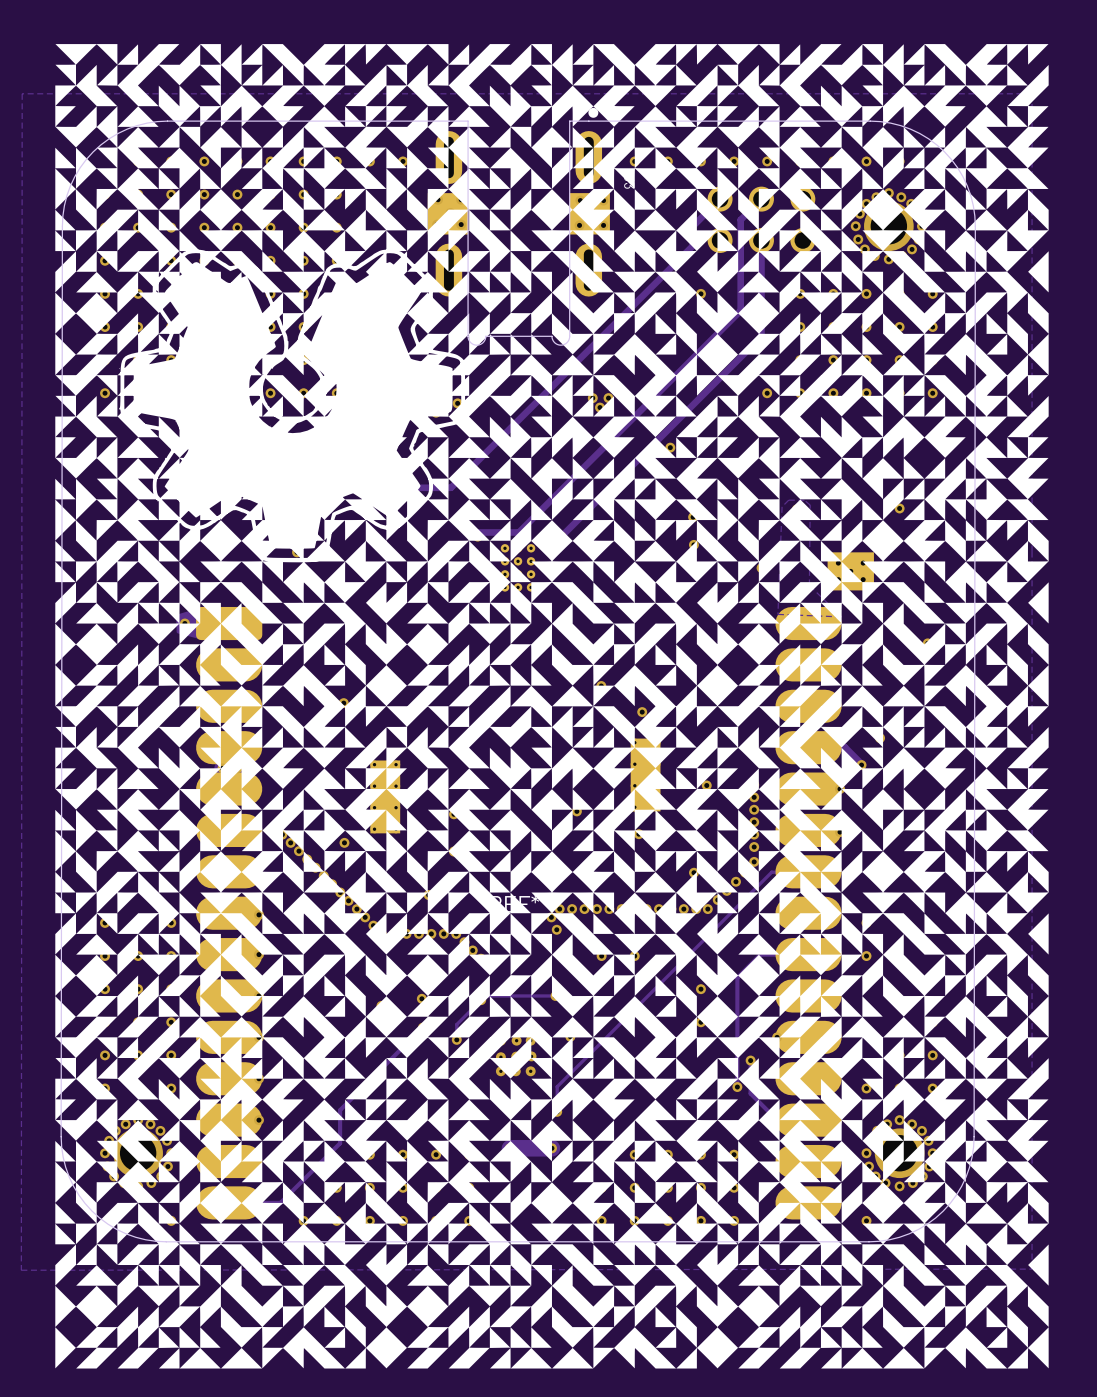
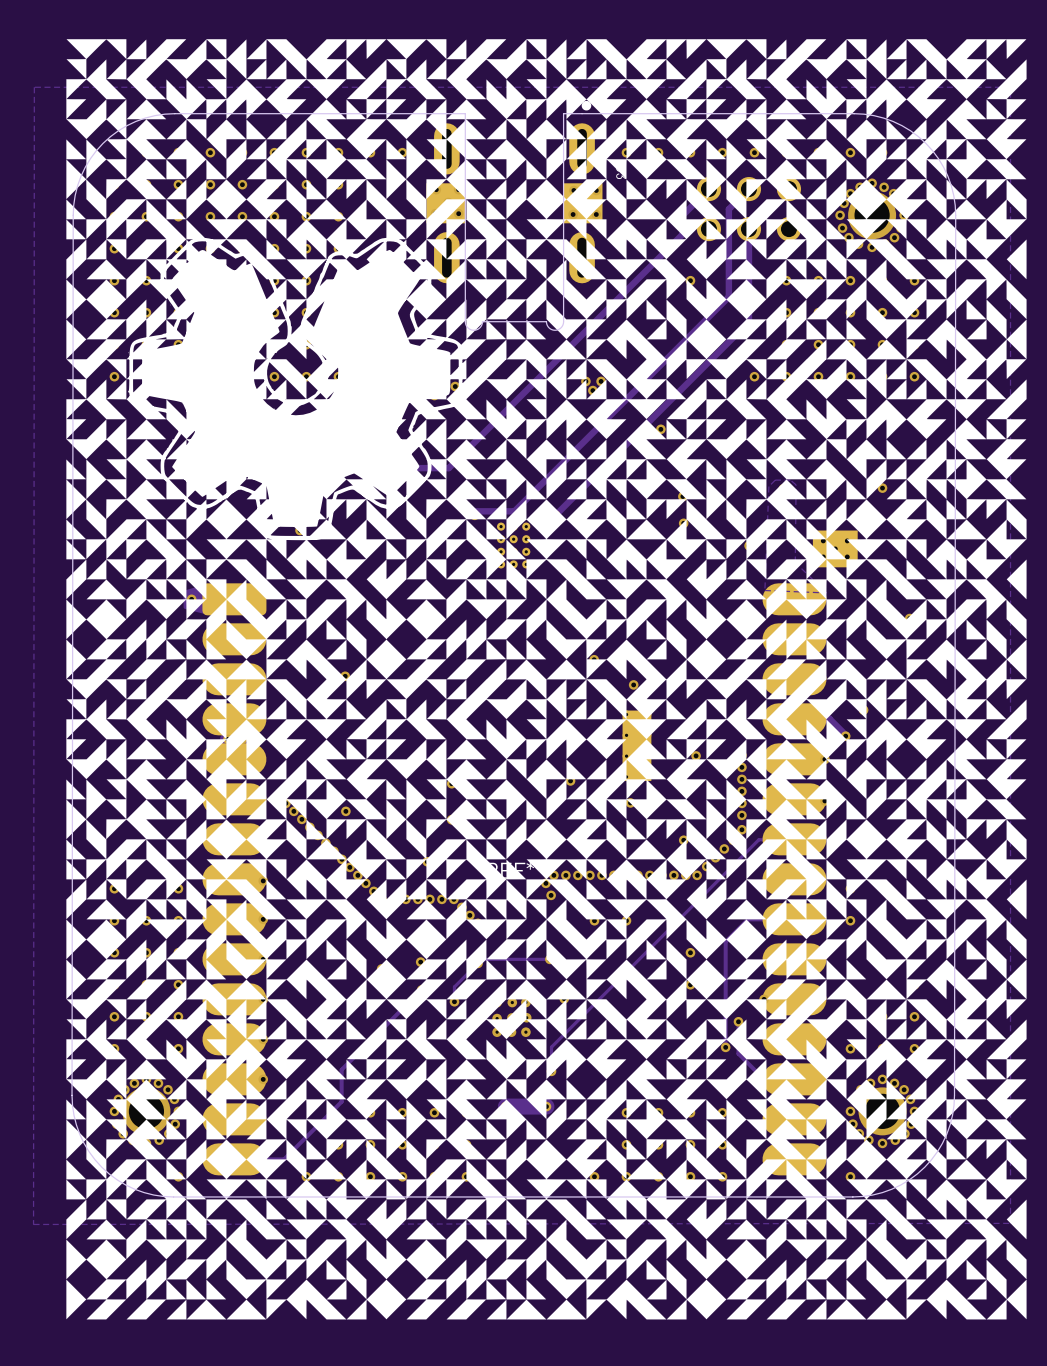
part: (385, 796) -> none

